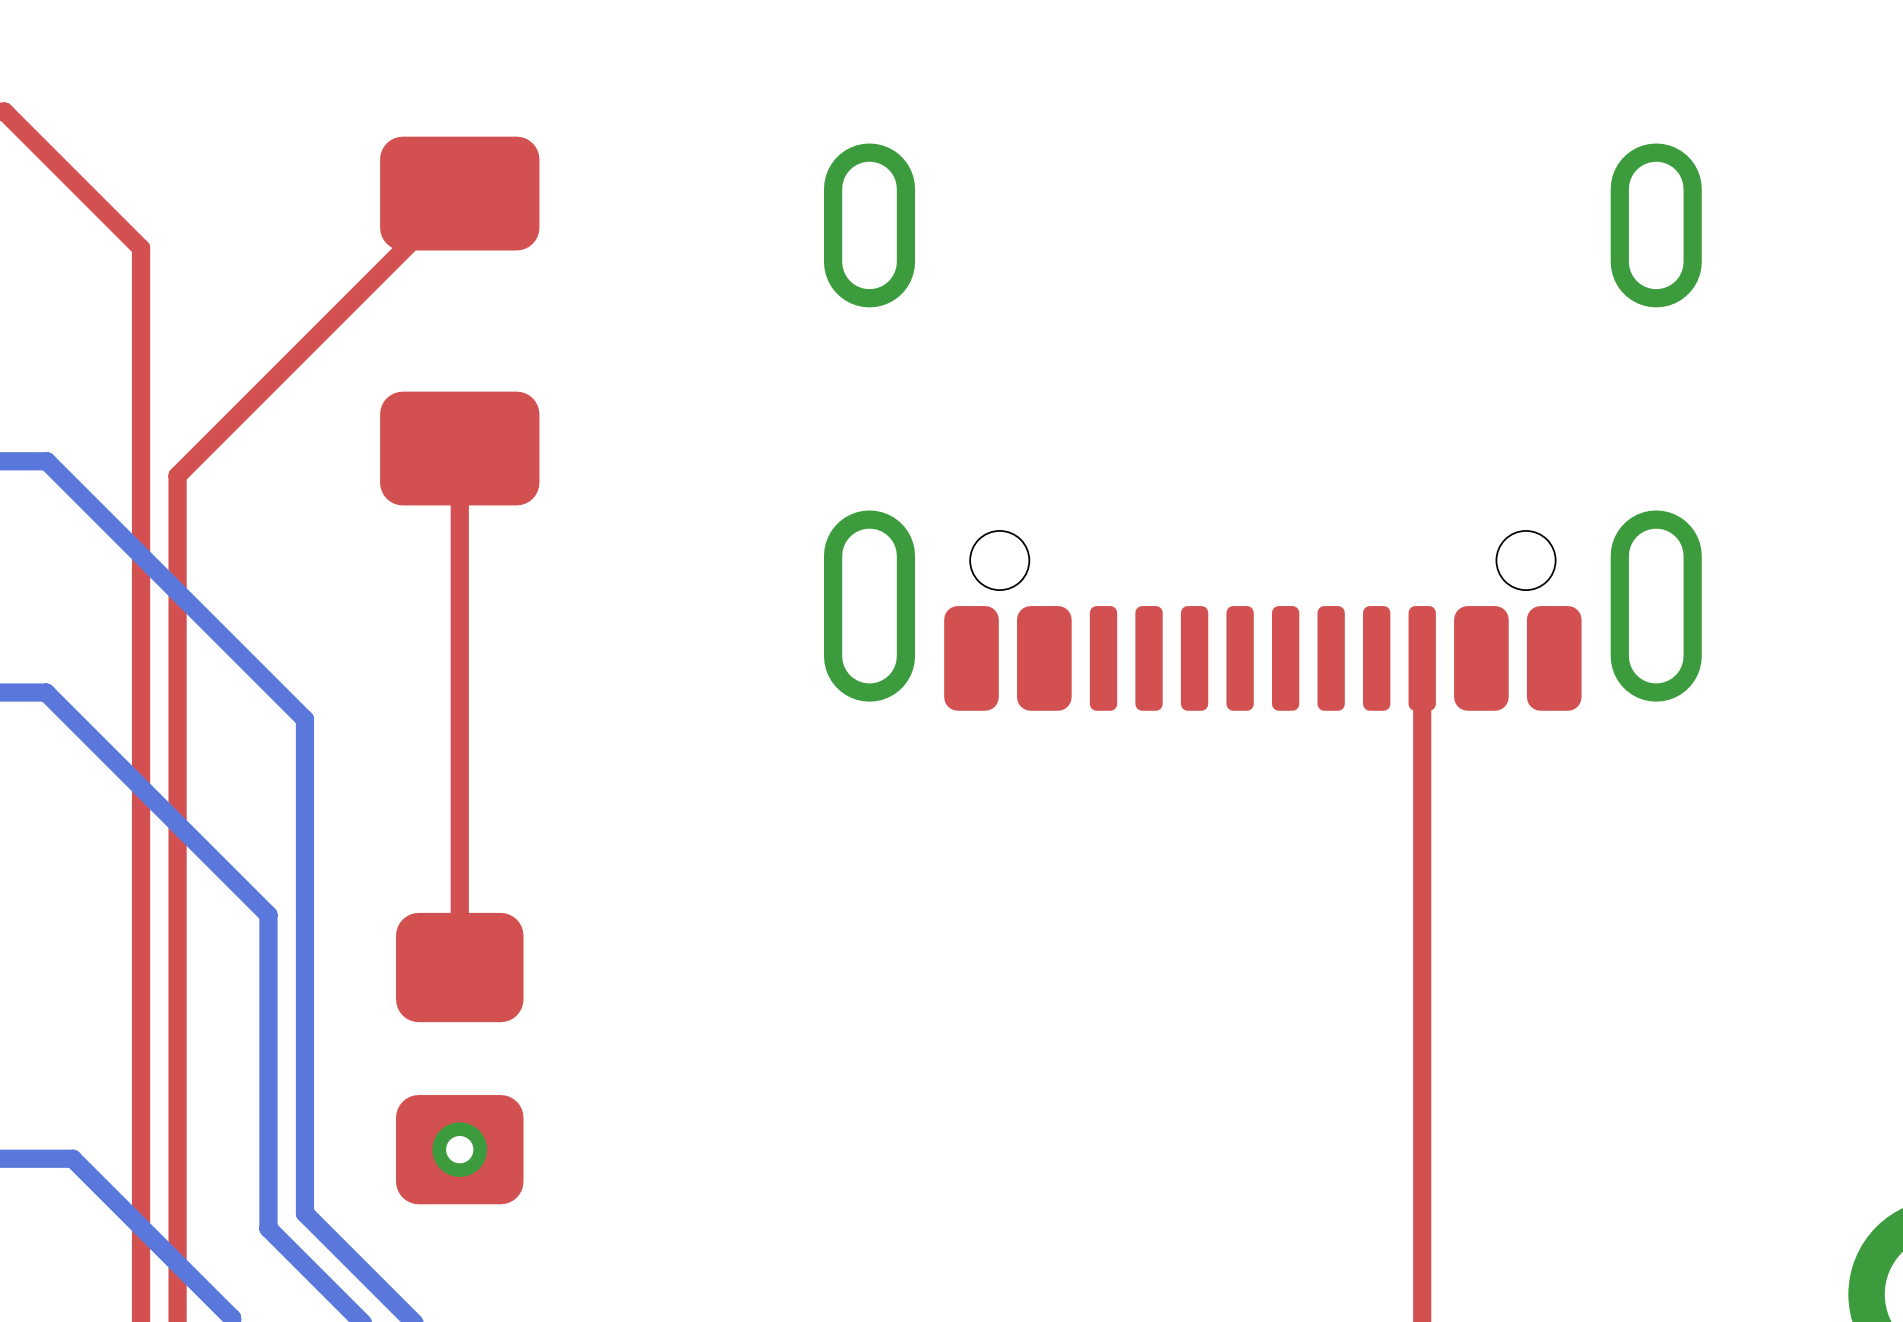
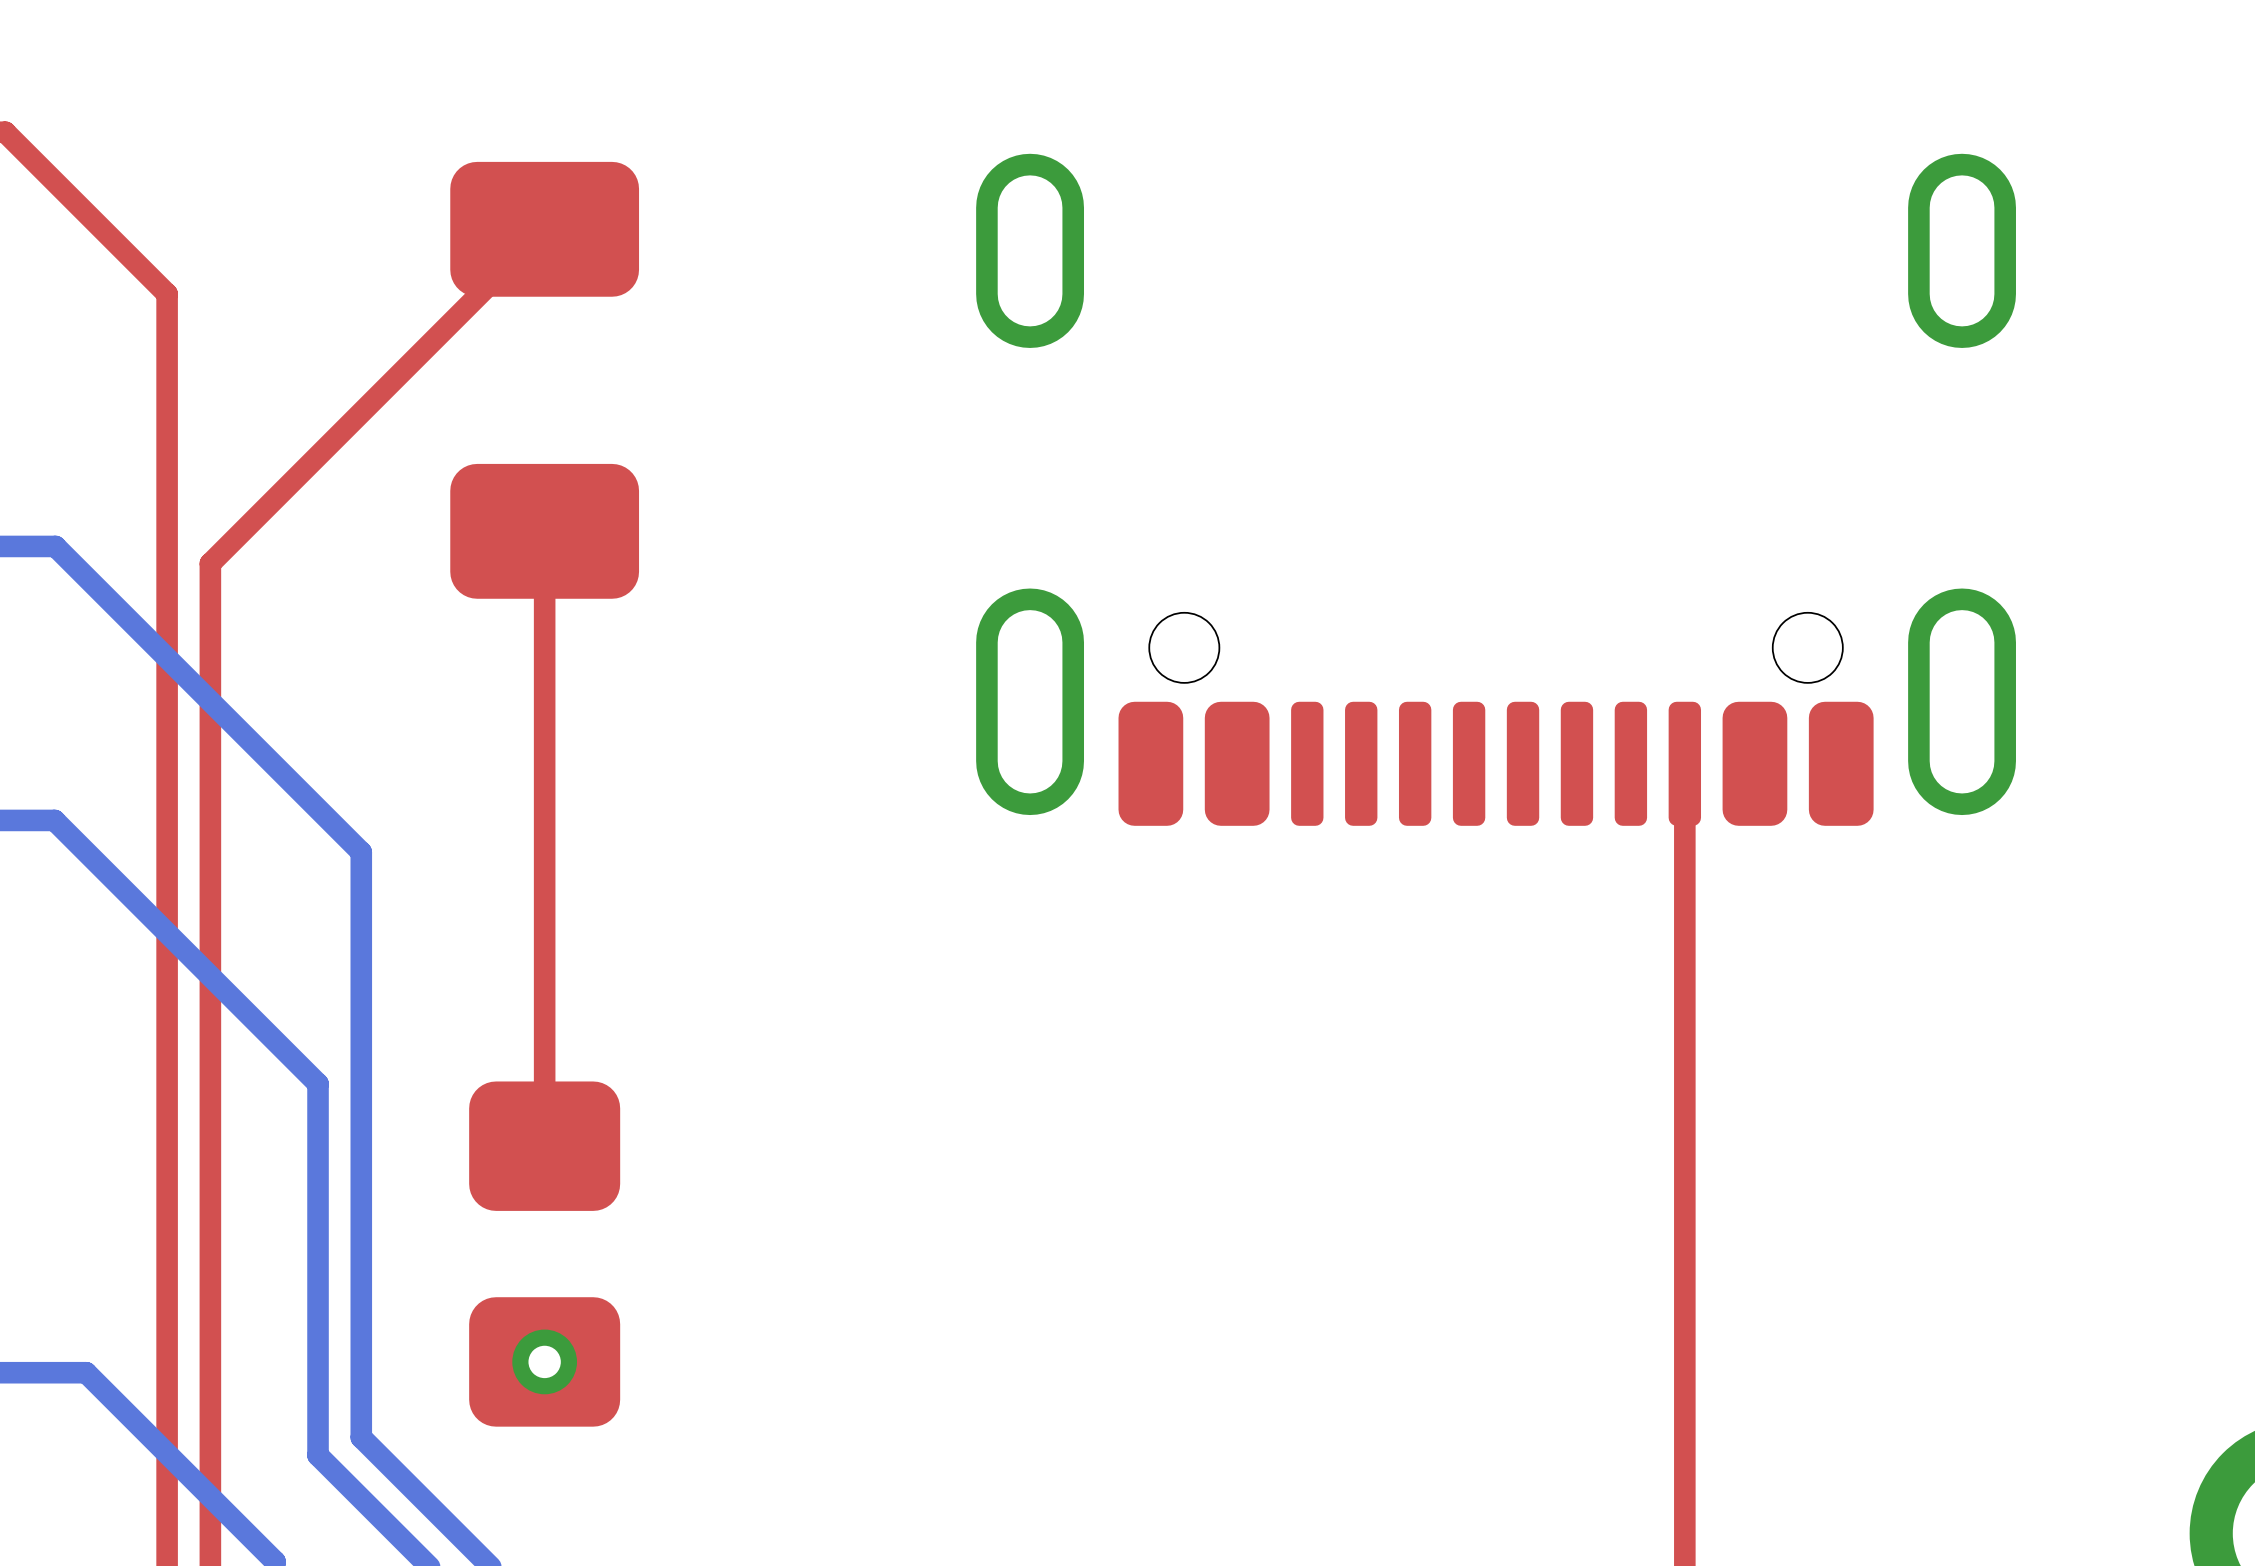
part position: (1262, 427) -> (1496, 489)

